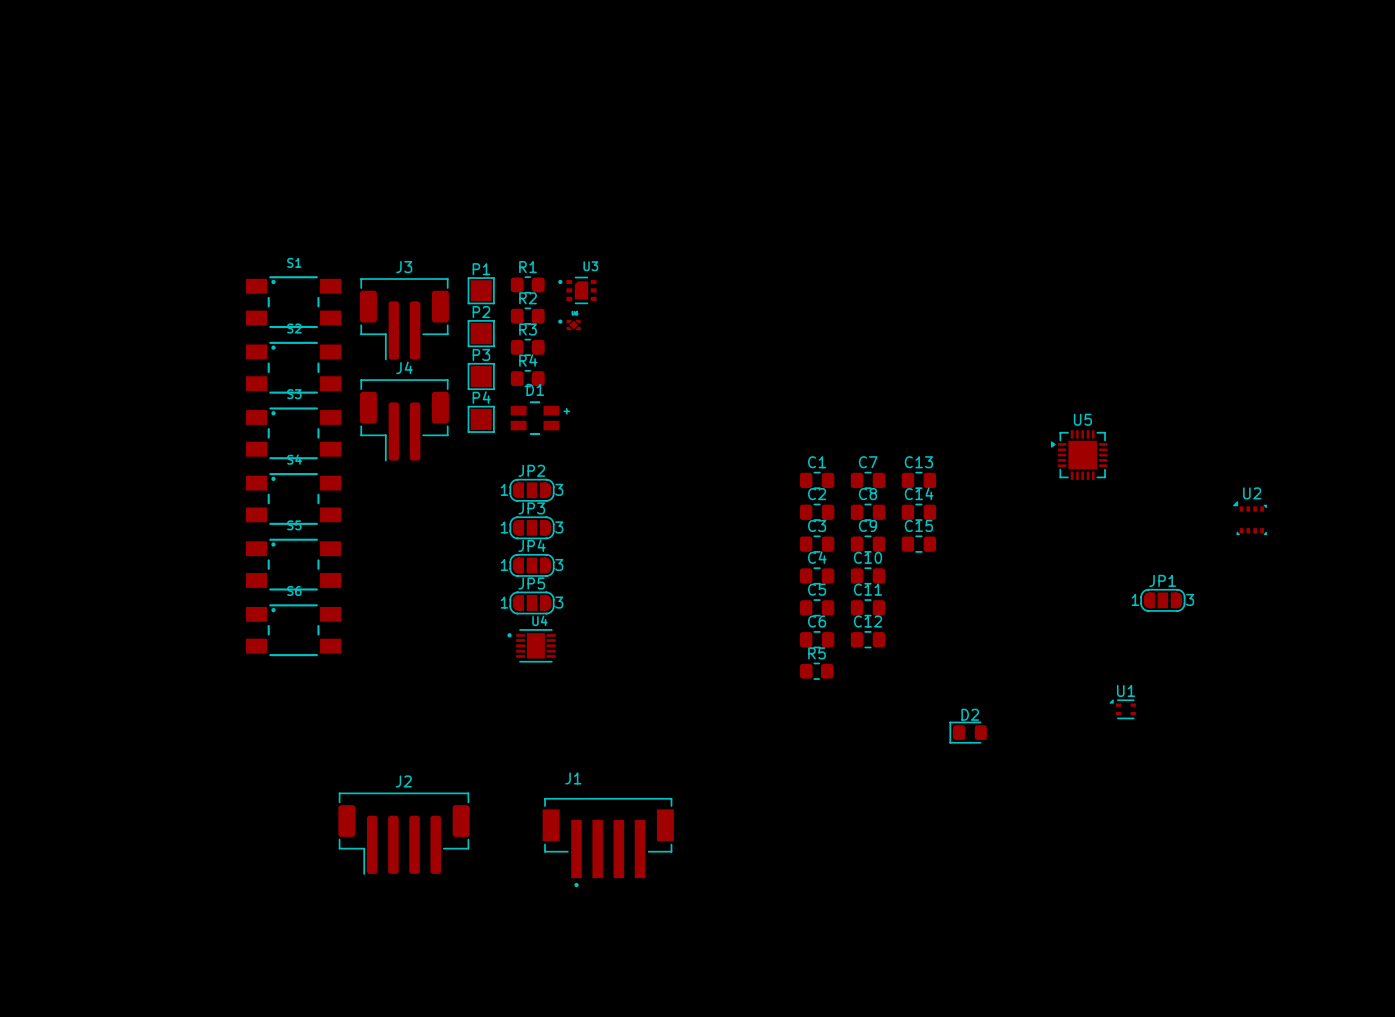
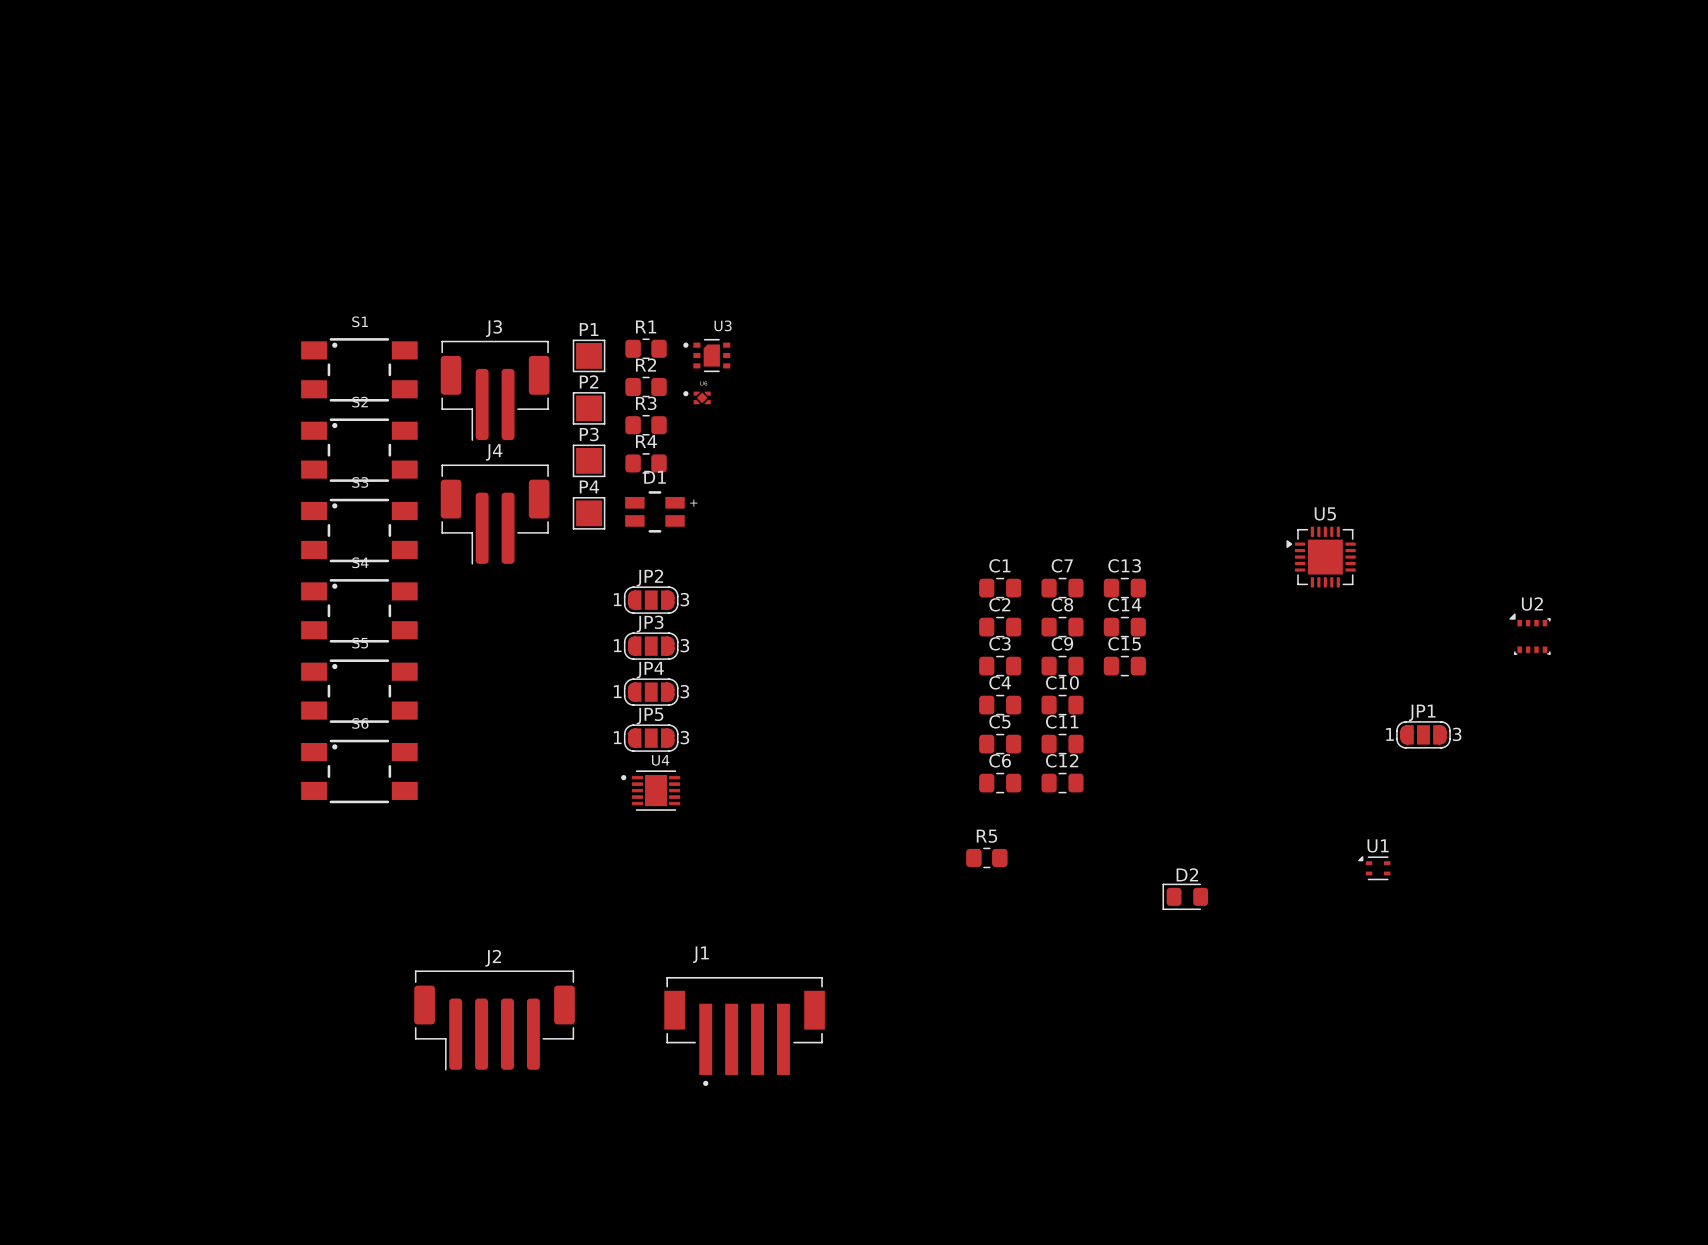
R5 position: (816, 671) -> (986, 857)

